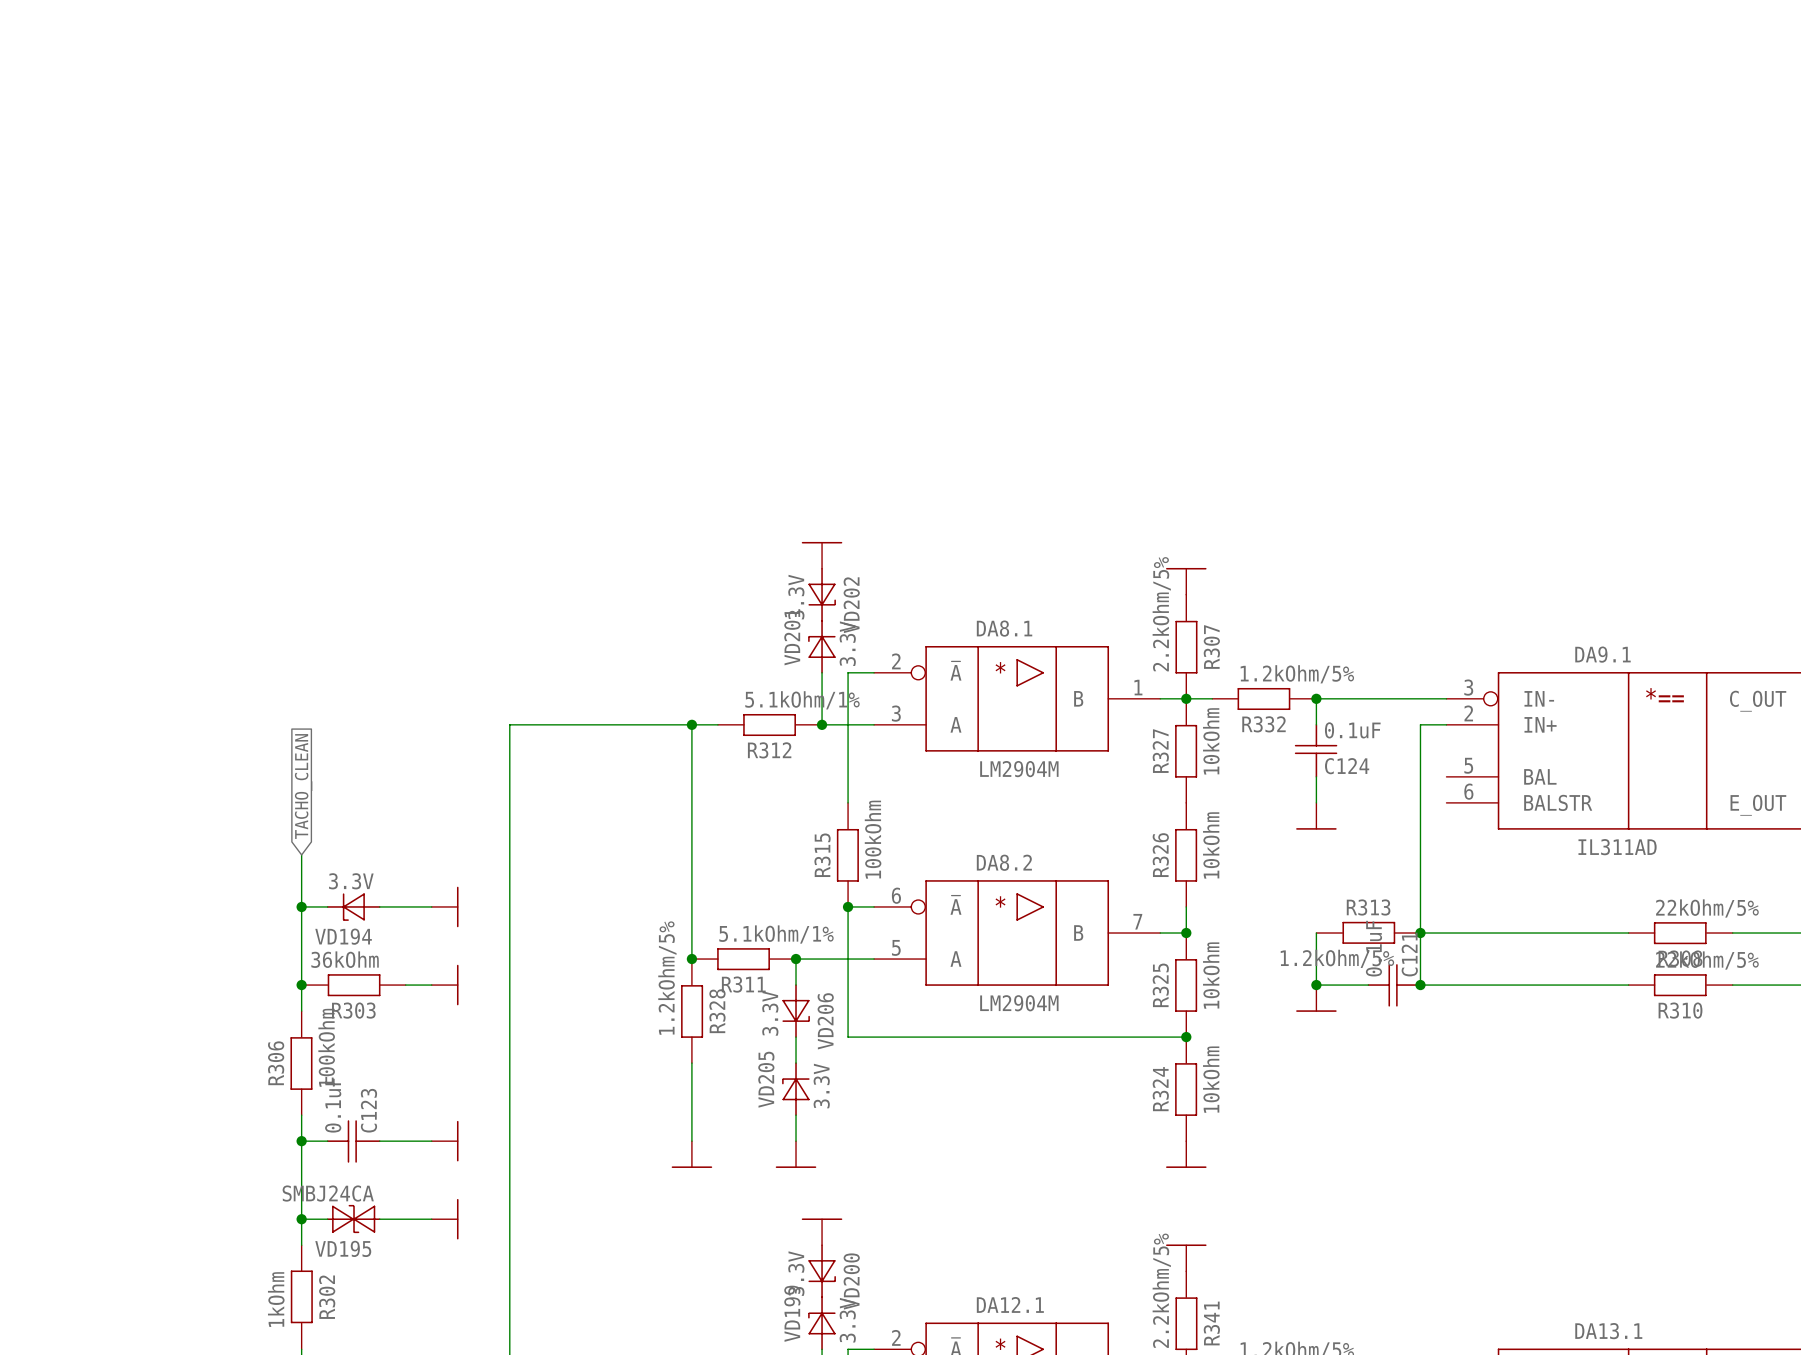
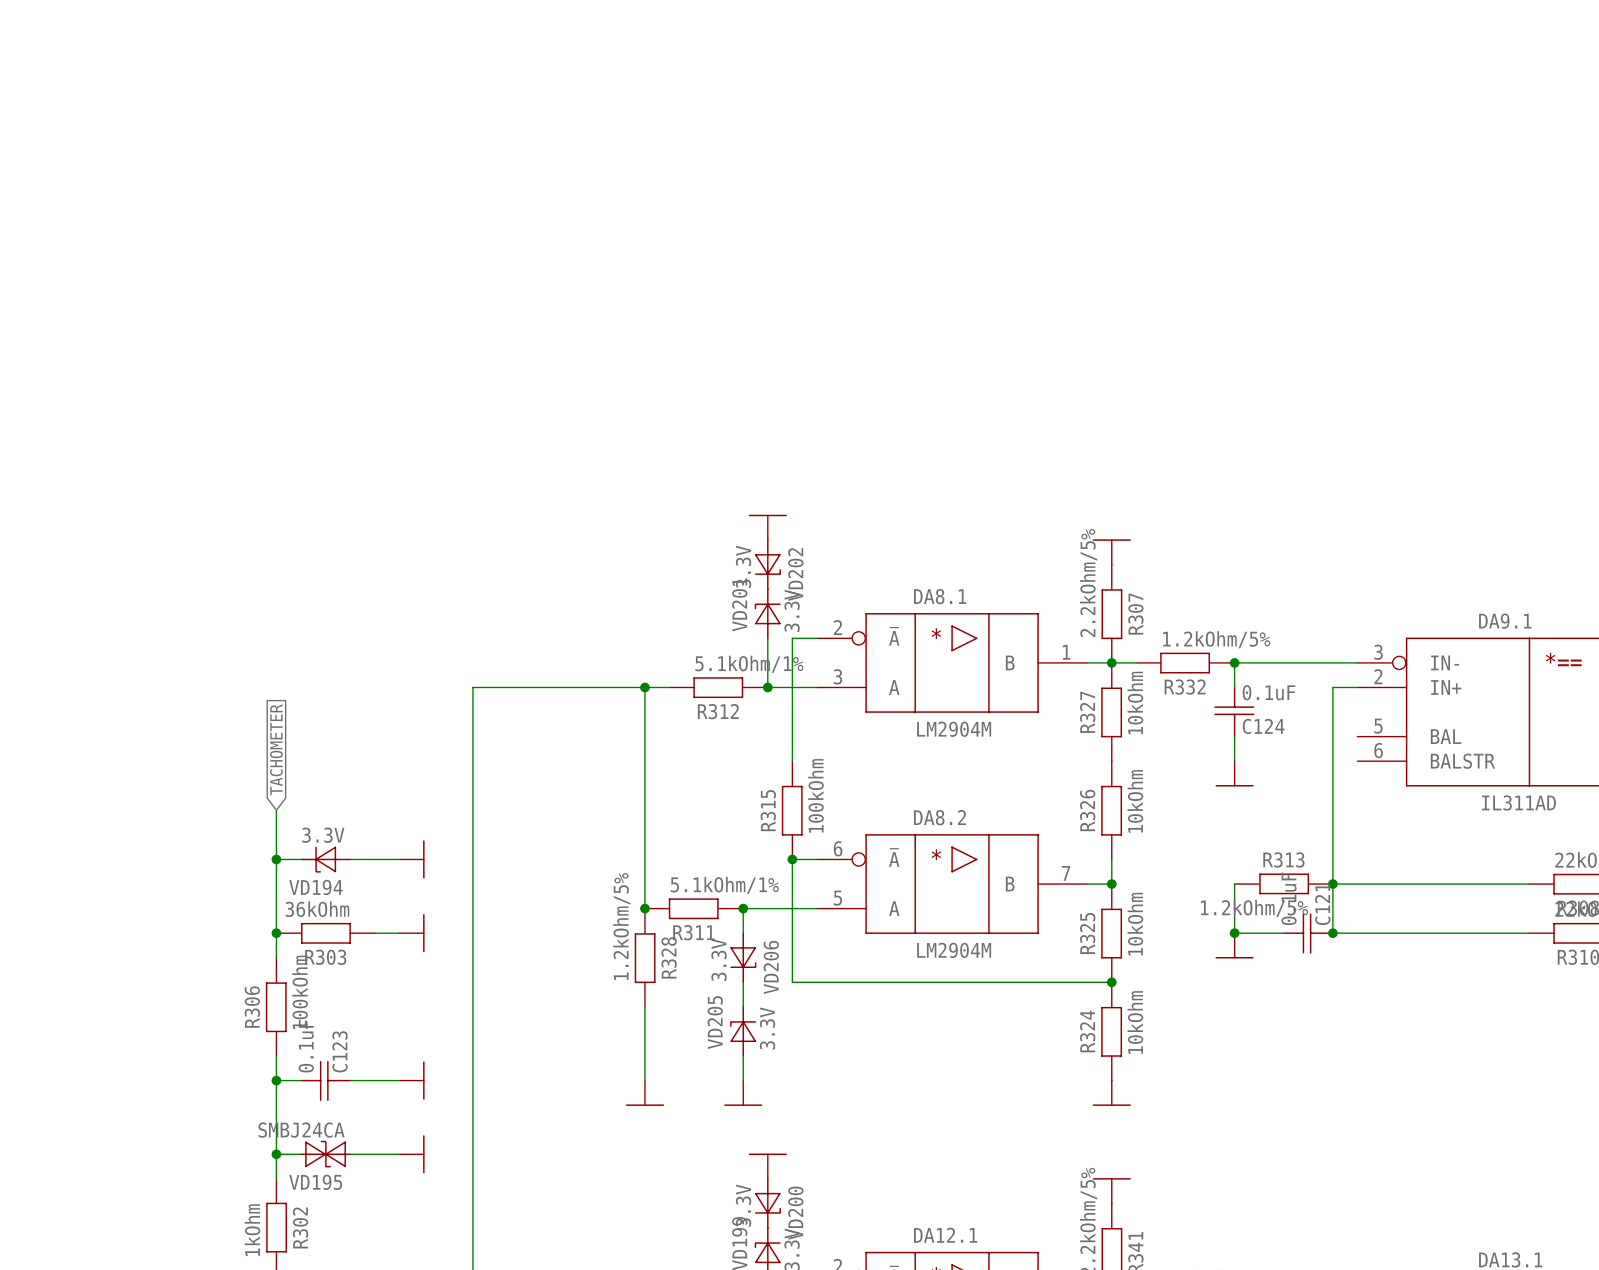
global label: TACHO_CLEAN (303, 786) -> TACHOMETER (276, 749)

